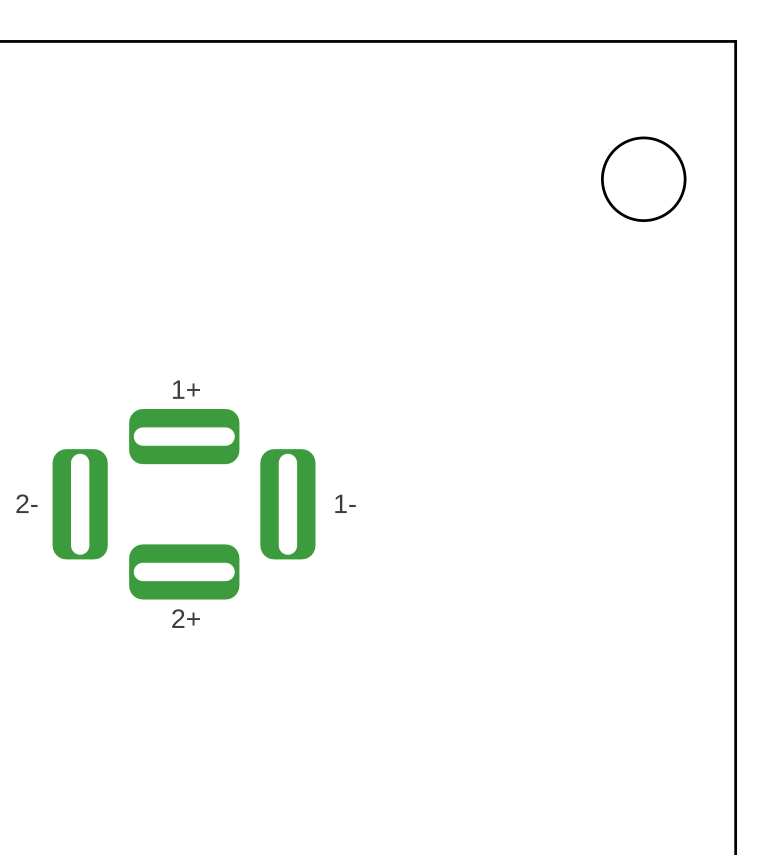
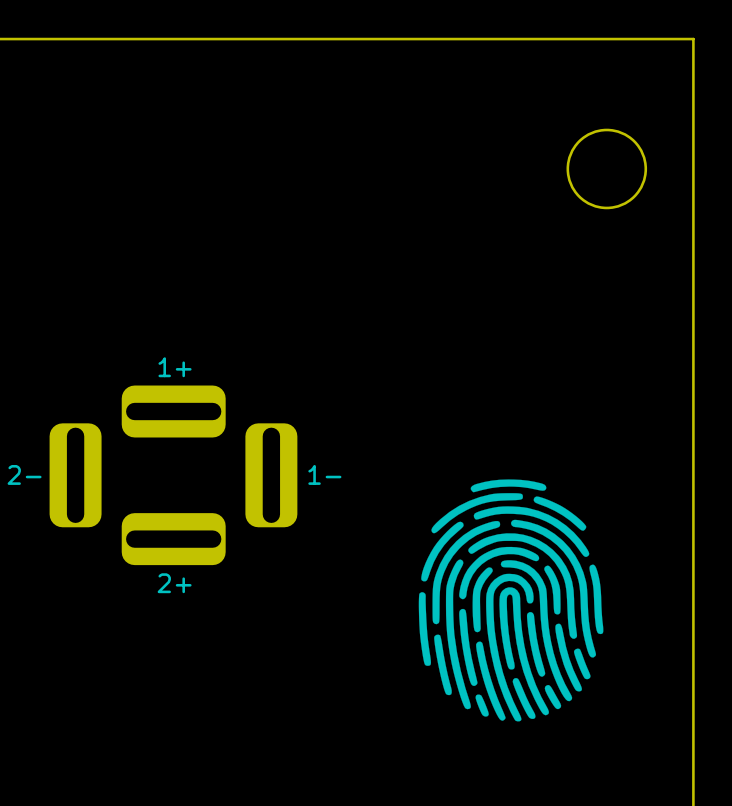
drawing: none -> [418, 479, 604, 722]

